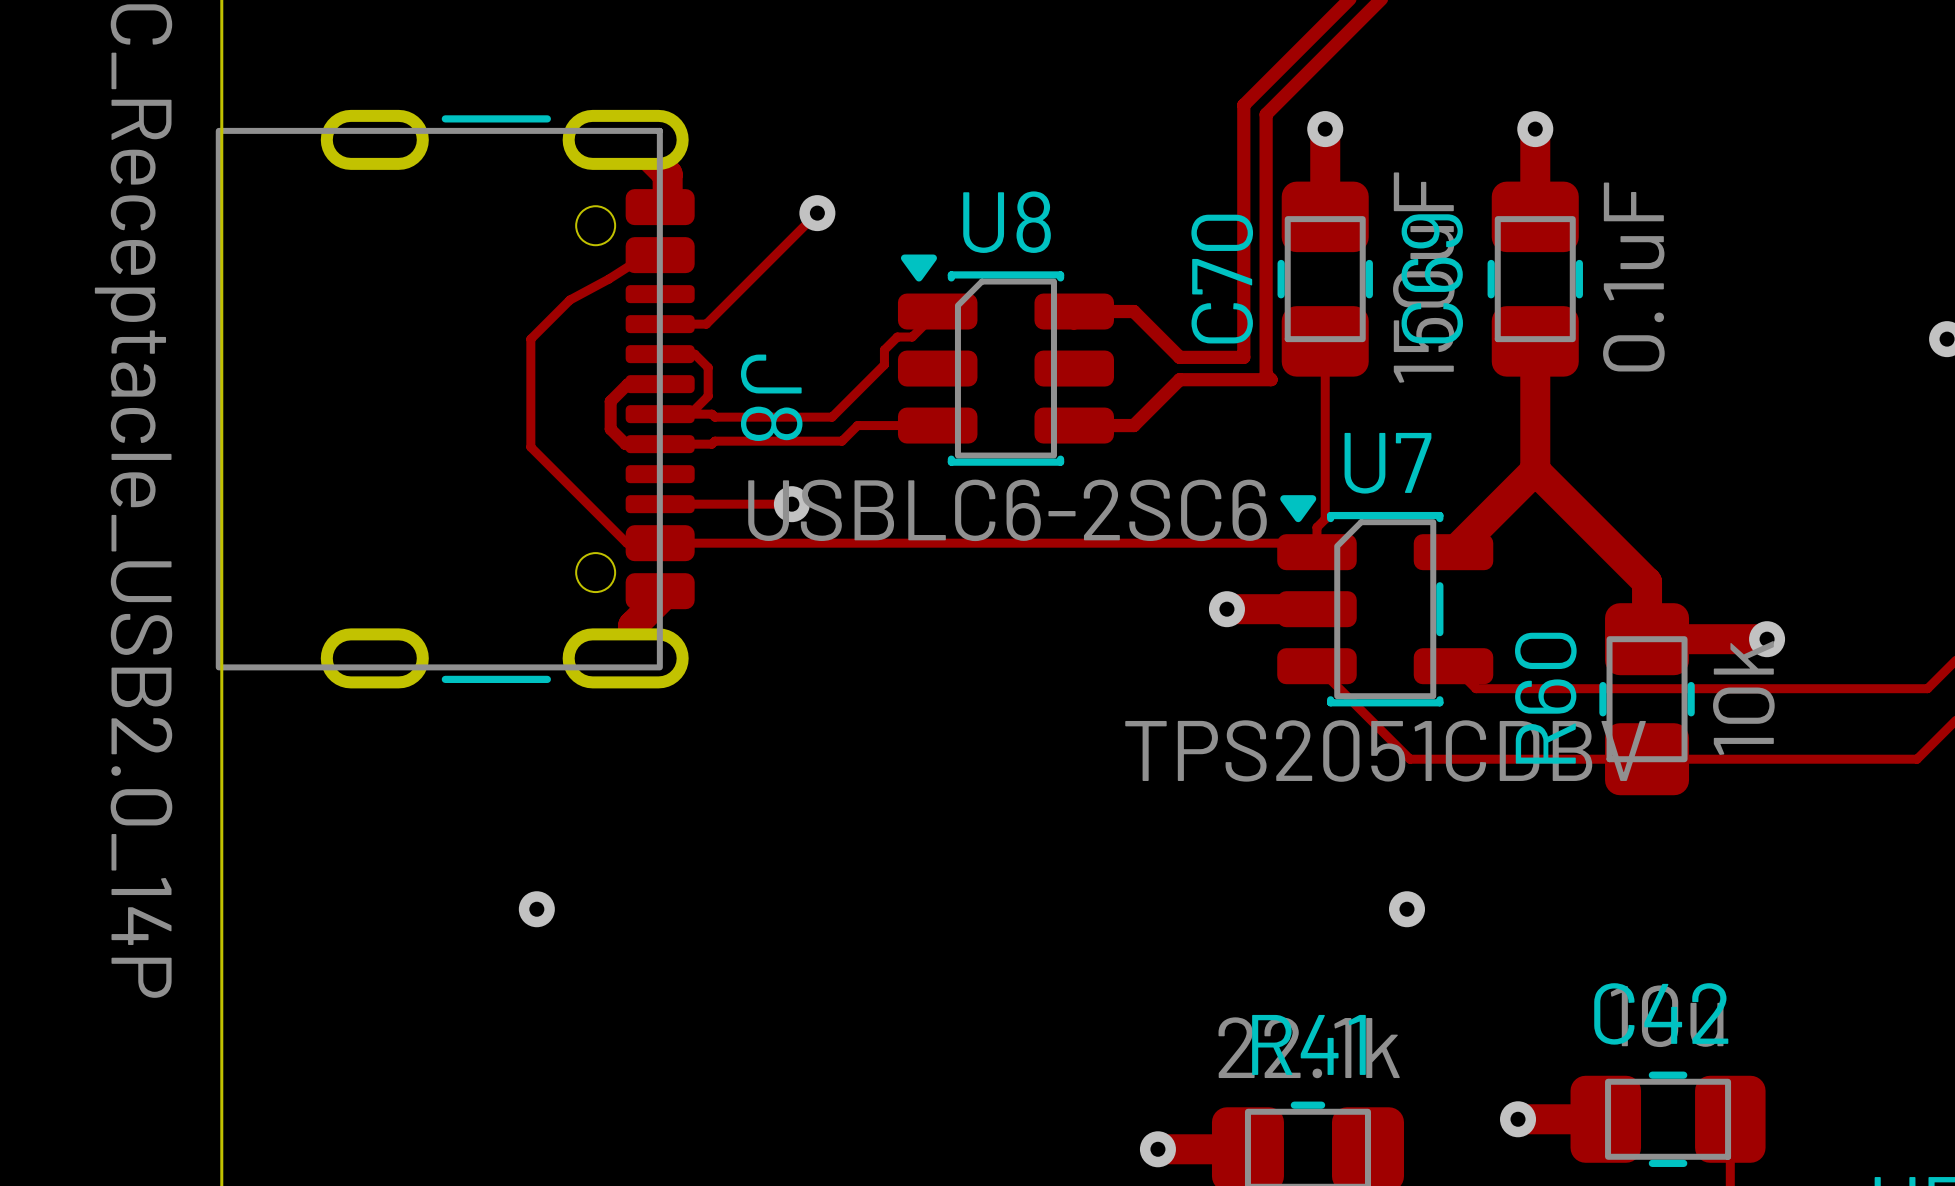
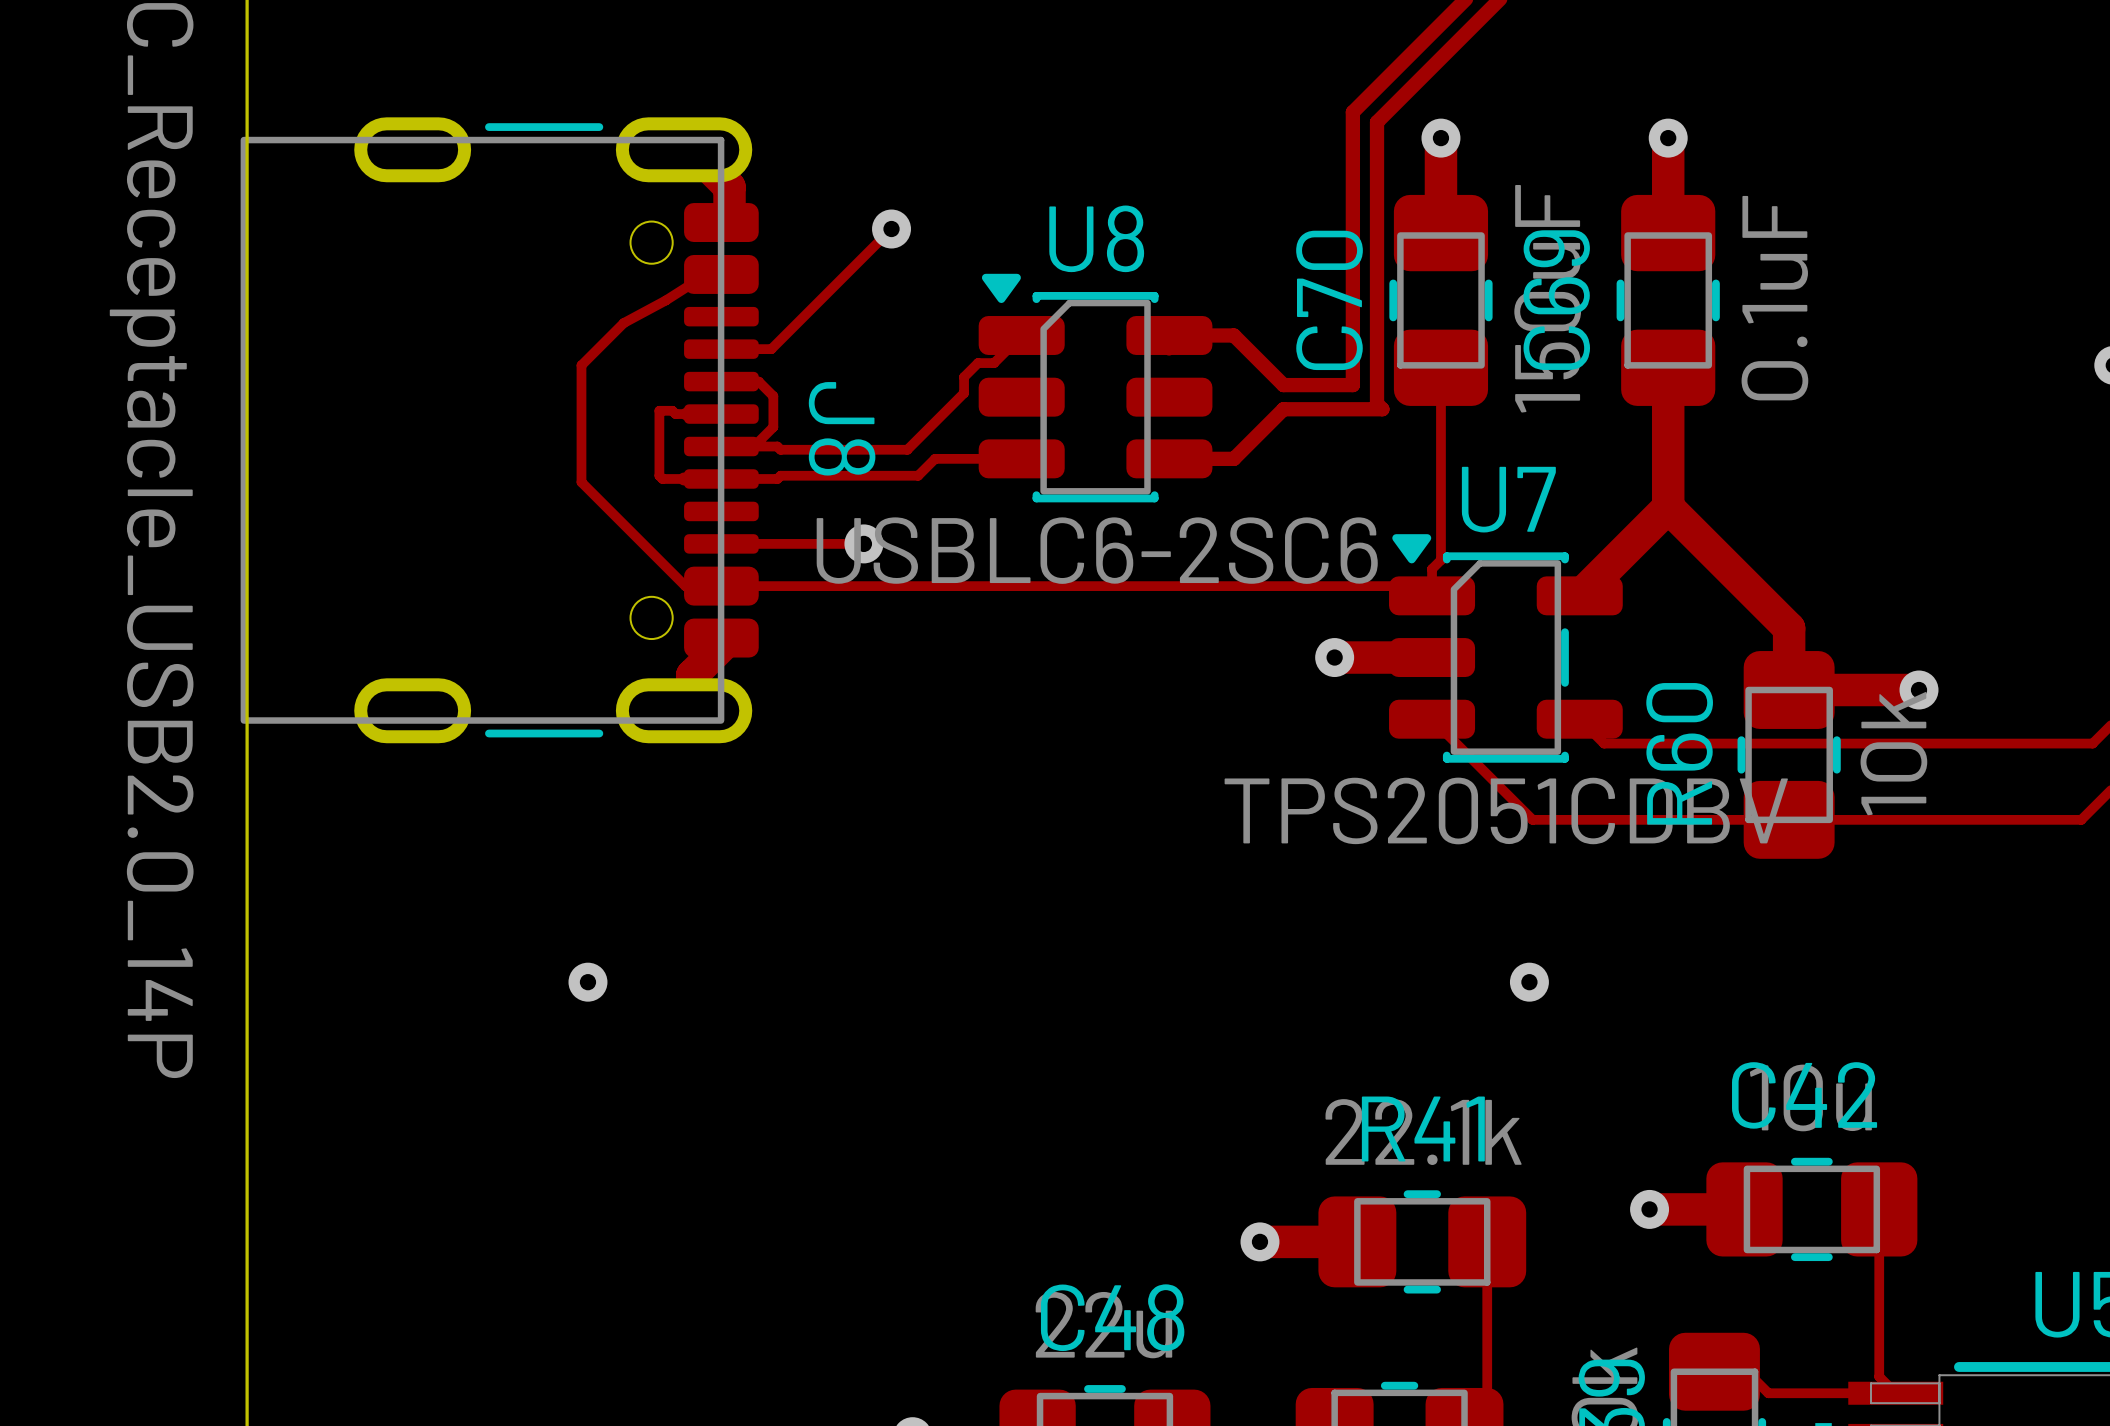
track: (627, 384) (610, 401) (610, 429) (625, 444) -> (686, 414) (675, 414) (672, 410) (659, 410) (659, 475) (662, 478) (684, 478)

